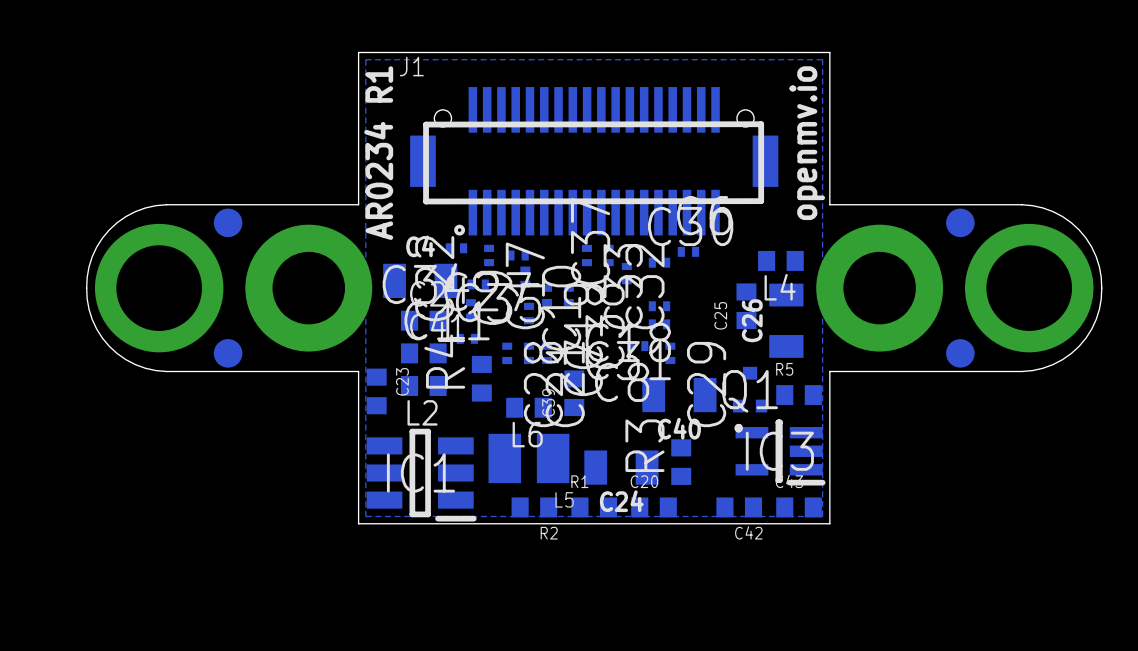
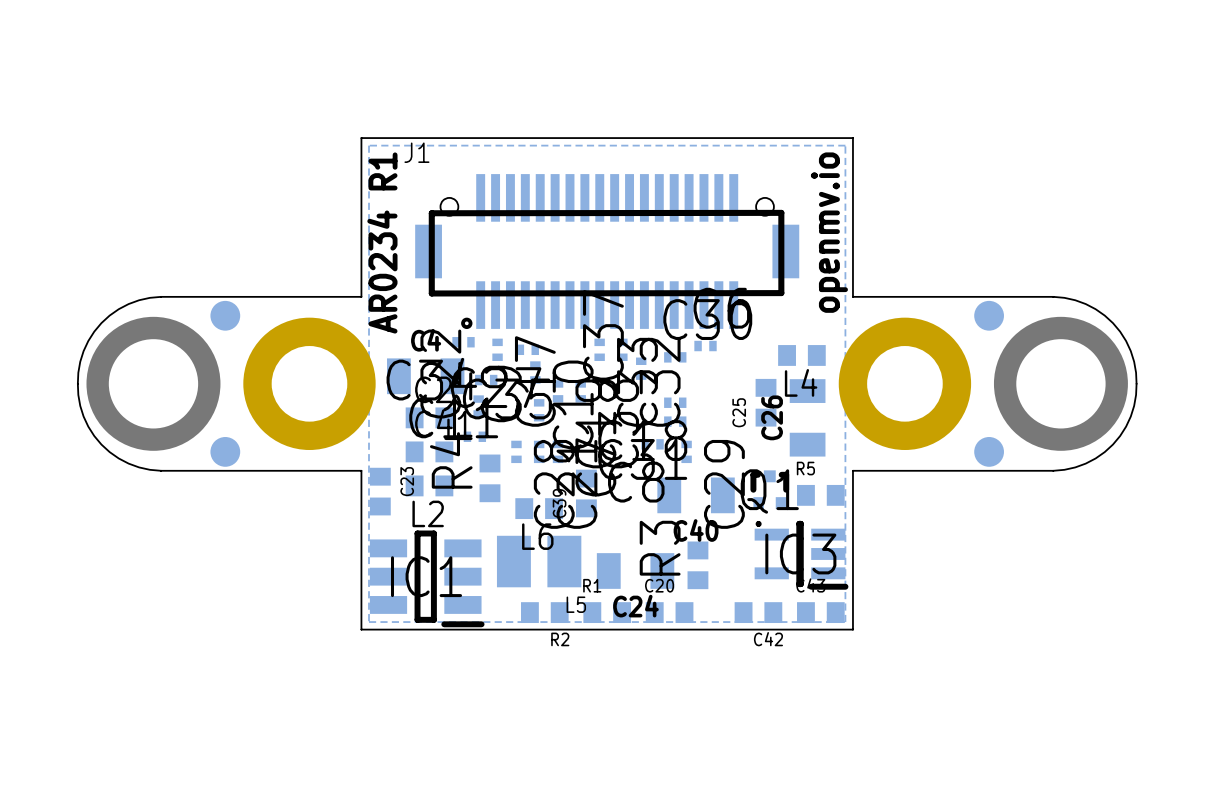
Q1 footprint: [732, 366, 768, 433] -> [750, 470, 790, 527]

